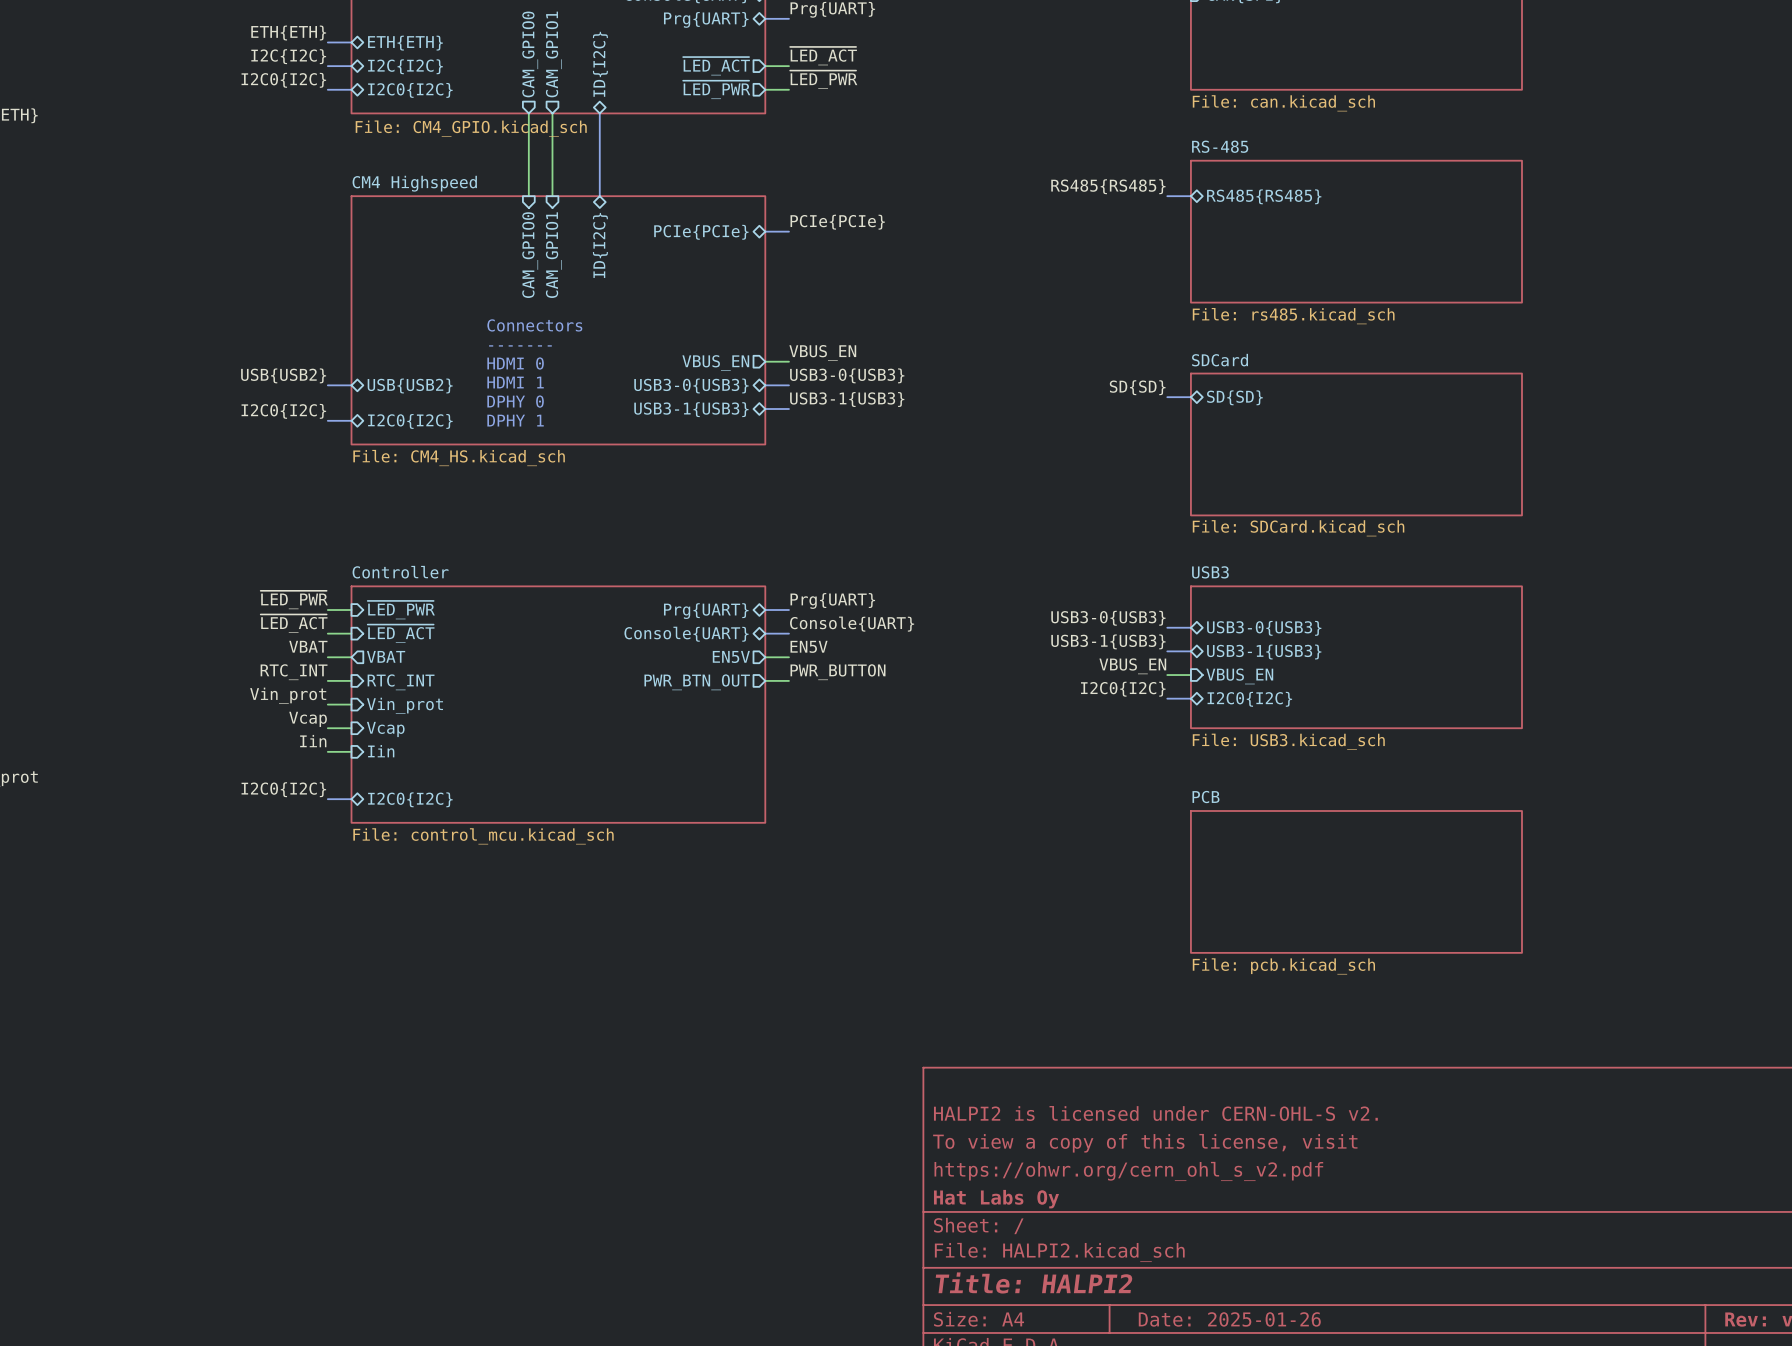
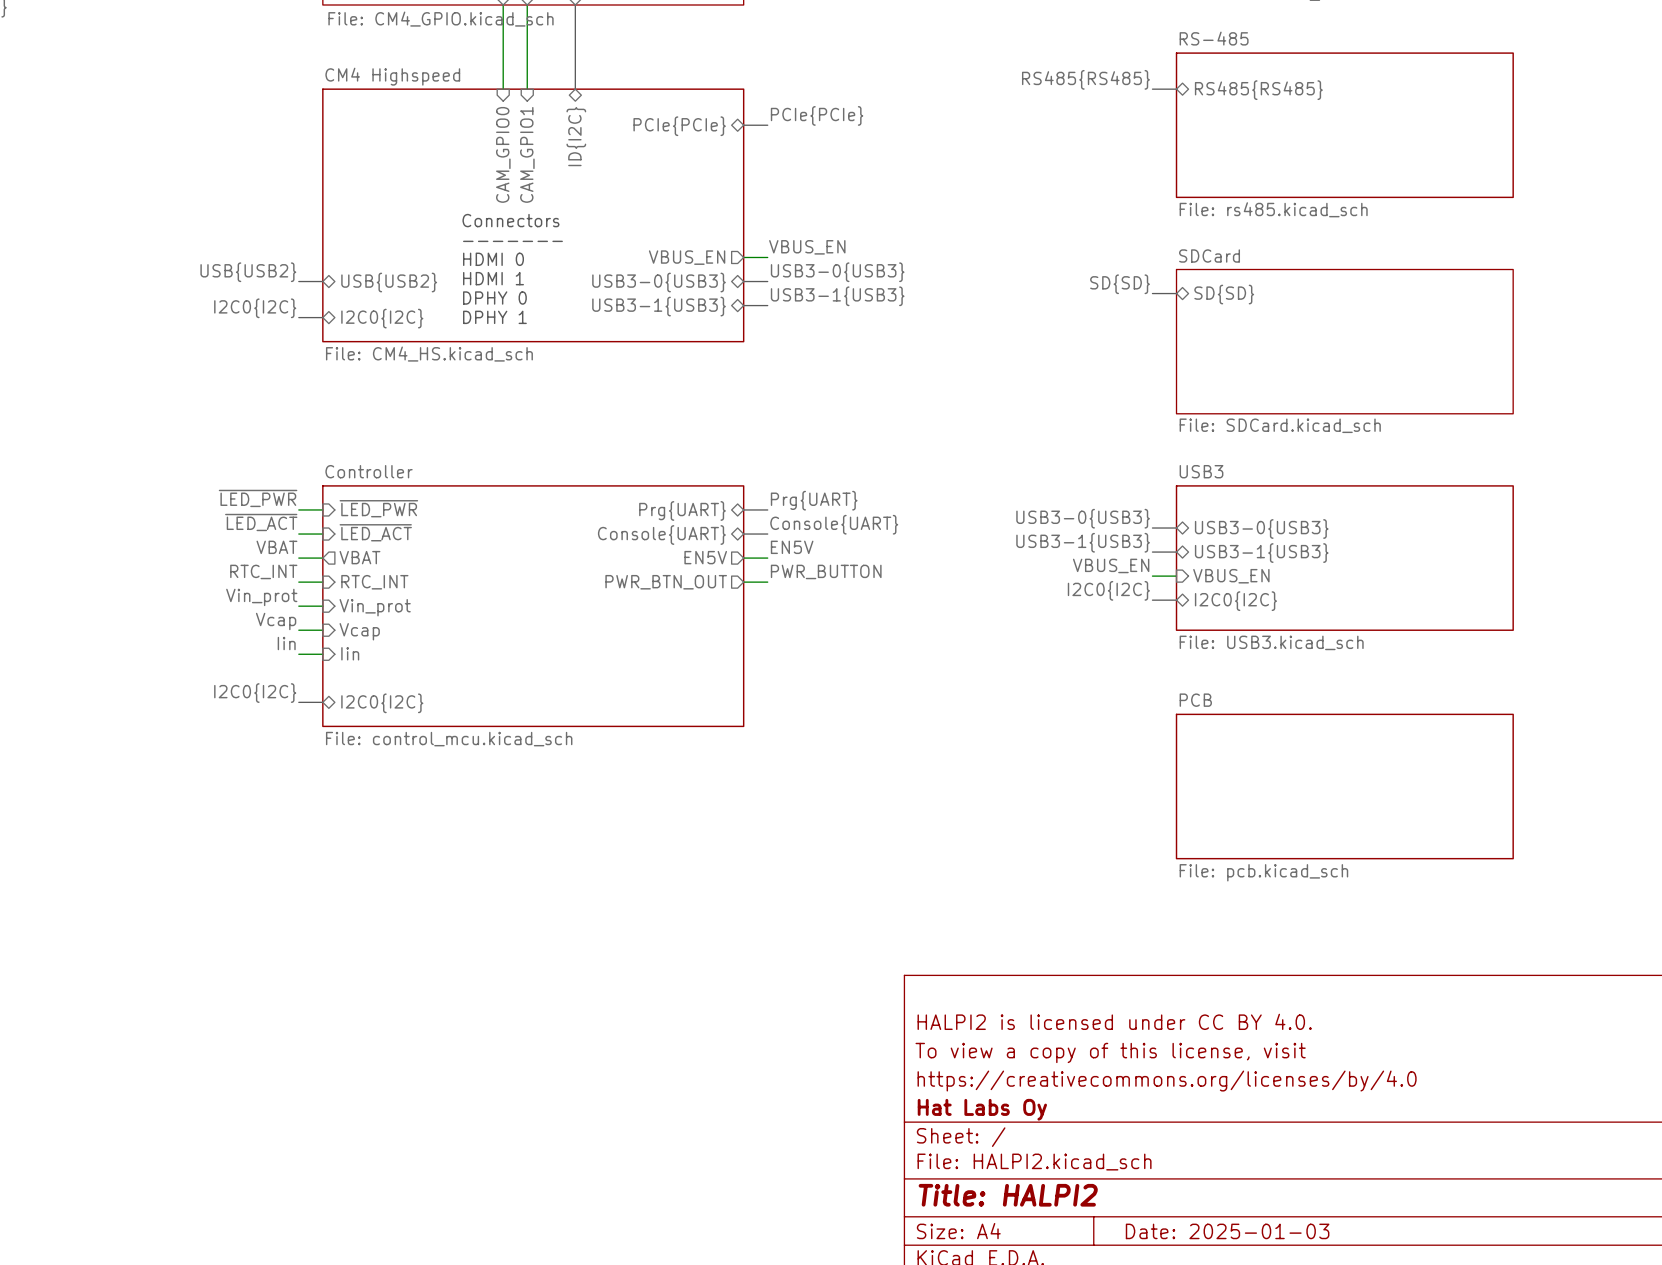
title block: HALPI2 is licensed under CERN-OHL-S v2. (1155, 1113) -> HALPI2 is licensed under CC BY 4.0. (1114, 1021)
title block: https://ohwr.org/cern_ohl_s_v2.pdf (1128, 1171) -> https://creativecommons.org/licenses/by/4.0 (1167, 1081)
title block: Date: 2025-01-26 (1229, 1319) -> Date: 2025-01-03 (1227, 1231)

